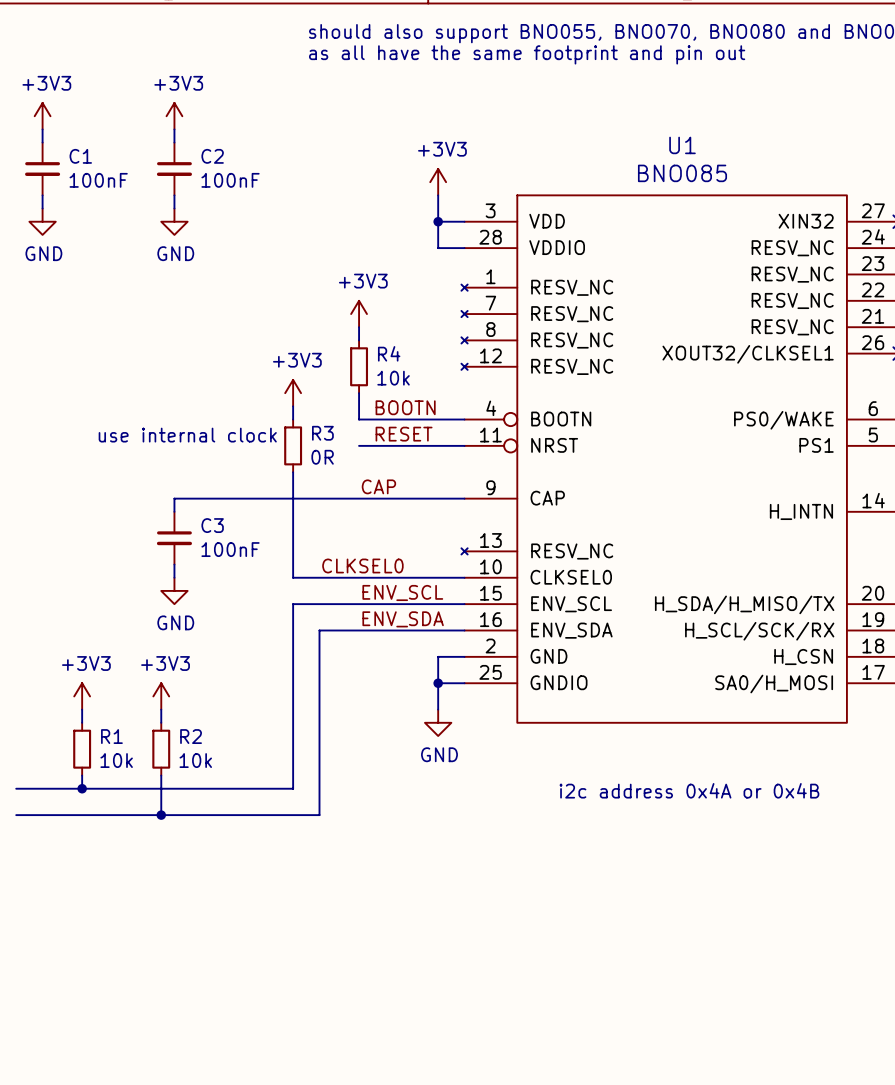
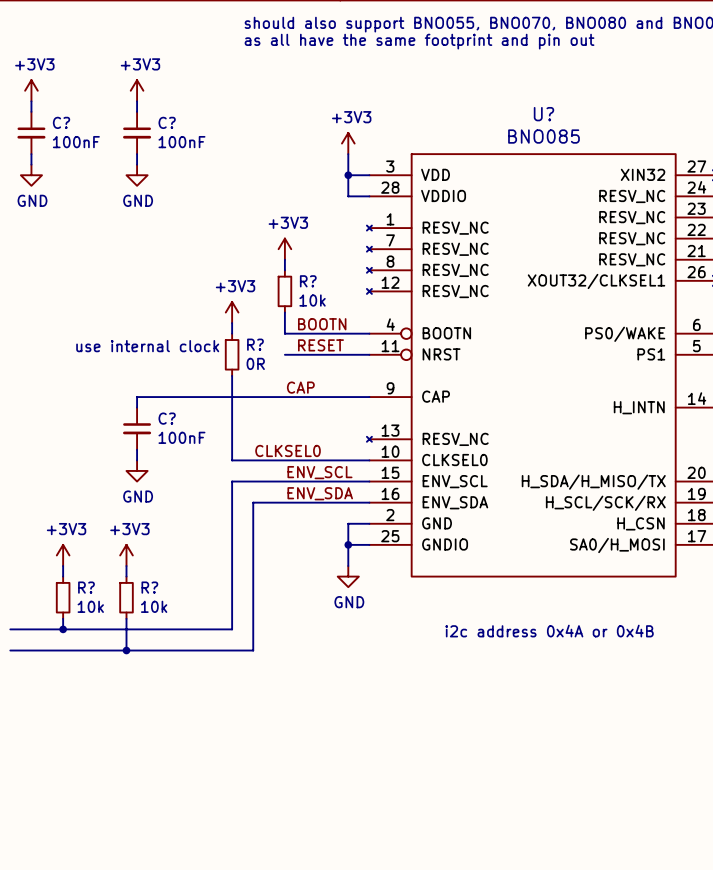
U1 name: U1 (682, 145) -> U? (543, 114)
C1 name: C1 (80, 156) -> C? (61, 122)
C2 name: C2 (212, 156) -> C? (167, 122)
R4 name: R4 (389, 353) -> R? (308, 281)
R3 name: R3 (322, 433) -> R? (255, 344)
C3 name: C3 (212, 525) -> C? (167, 418)
R1 name: R1 (111, 736) -> R? (86, 587)
R2 name: R2 (191, 736) -> R? (149, 587)

